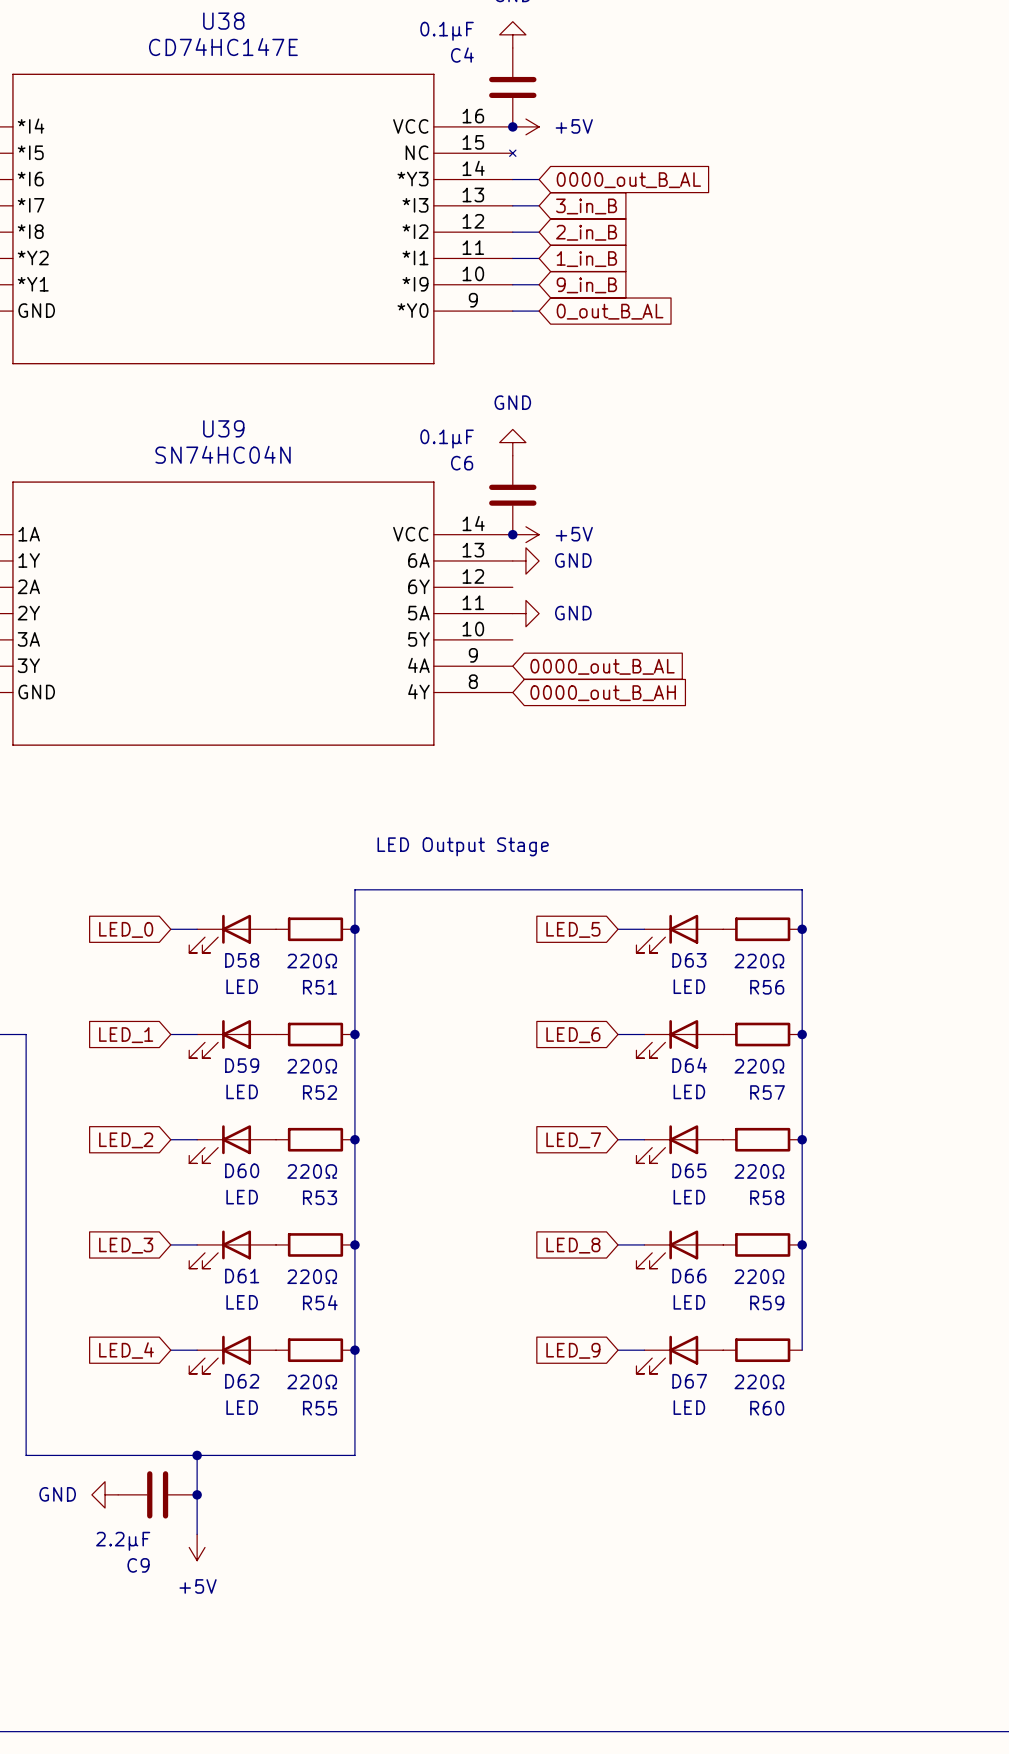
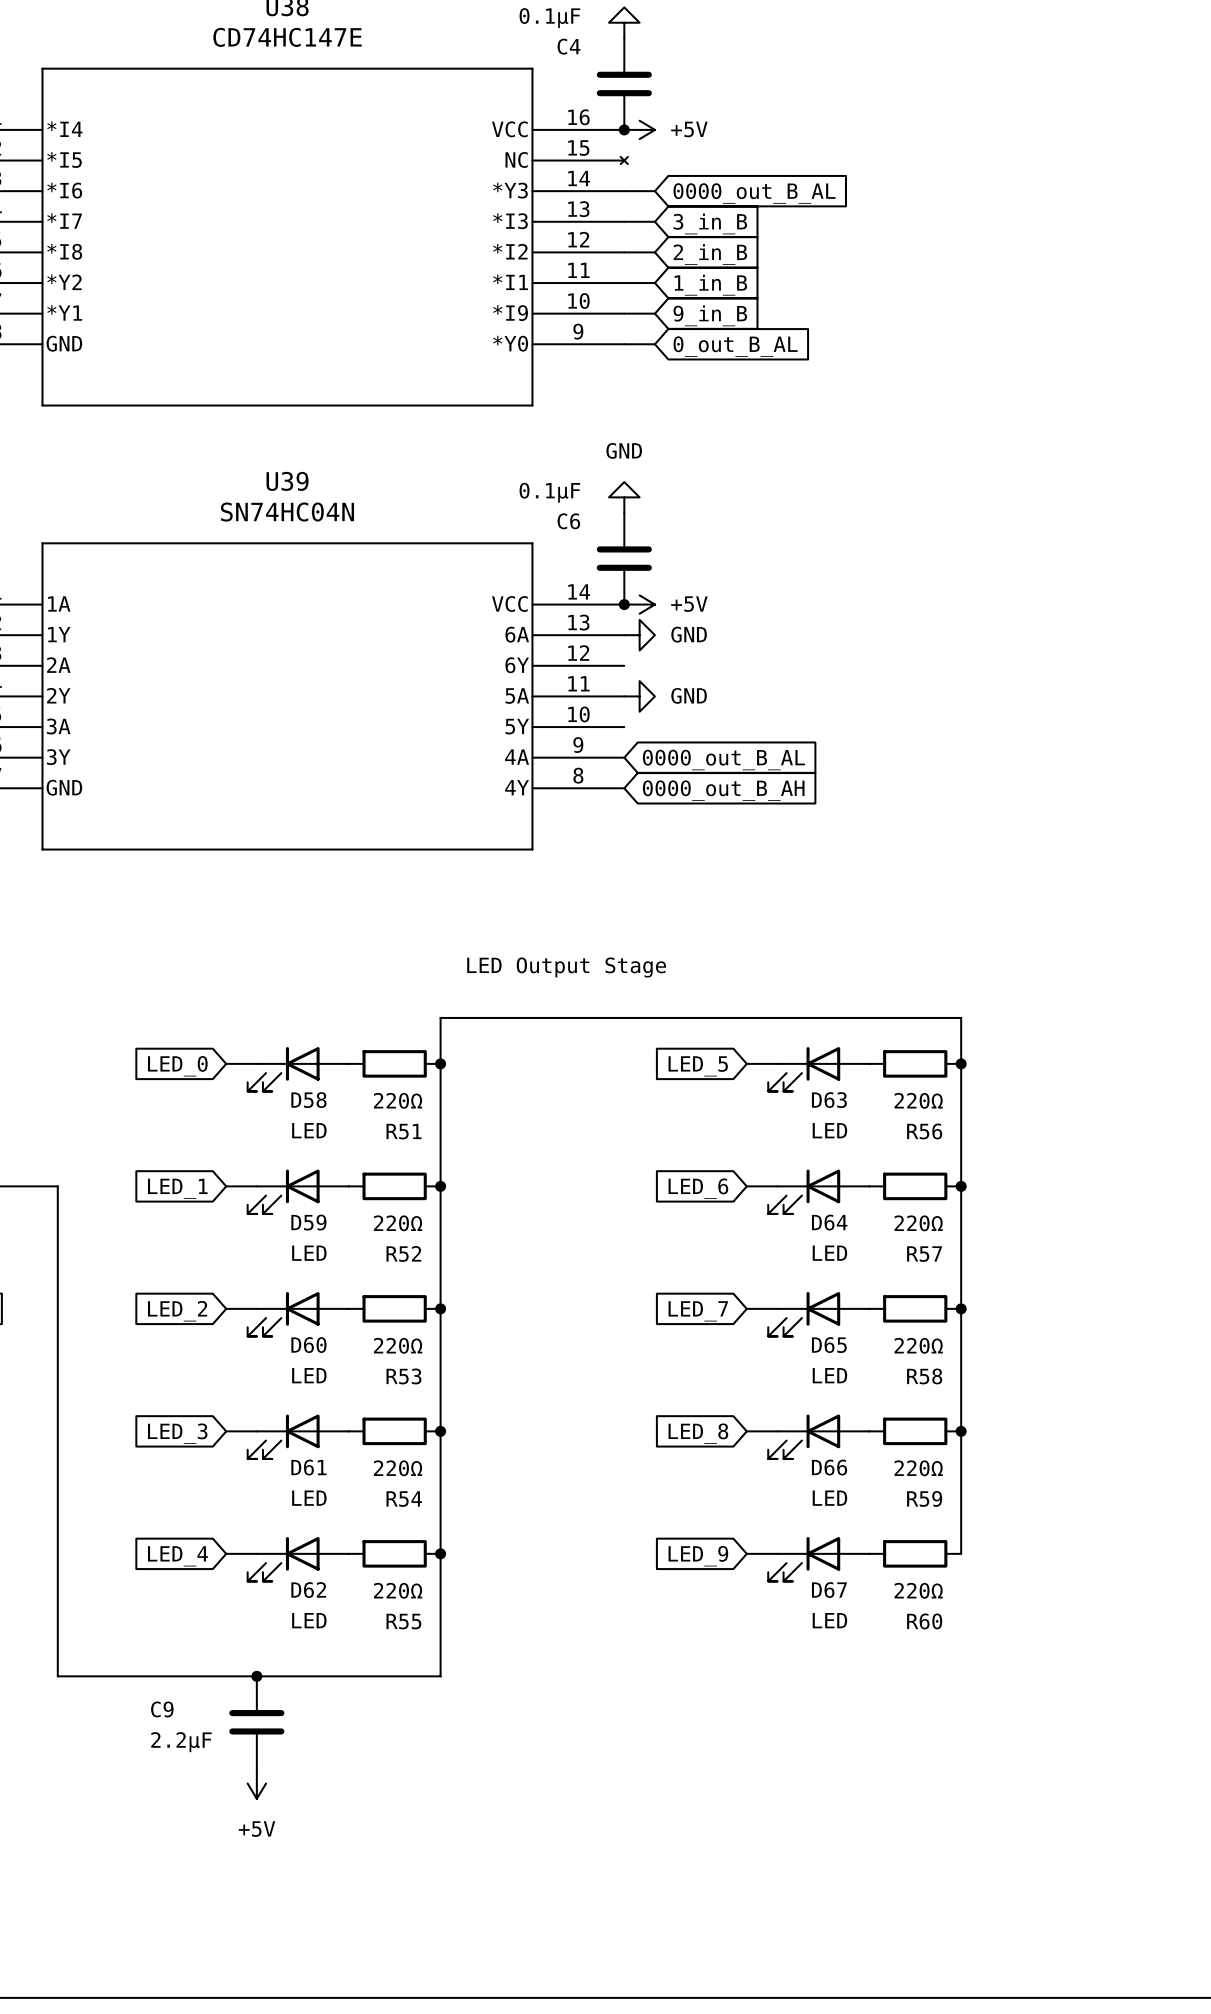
power symbol: GND (105, 1494) -> none
C9 rotation: 0° (157, 1494) -> 90° clockwise (256, 1722)
junction: (197, 1494) -> none
C9 value position: 2.2µF (123, 1541) -> 2.2µF (181, 1742)

